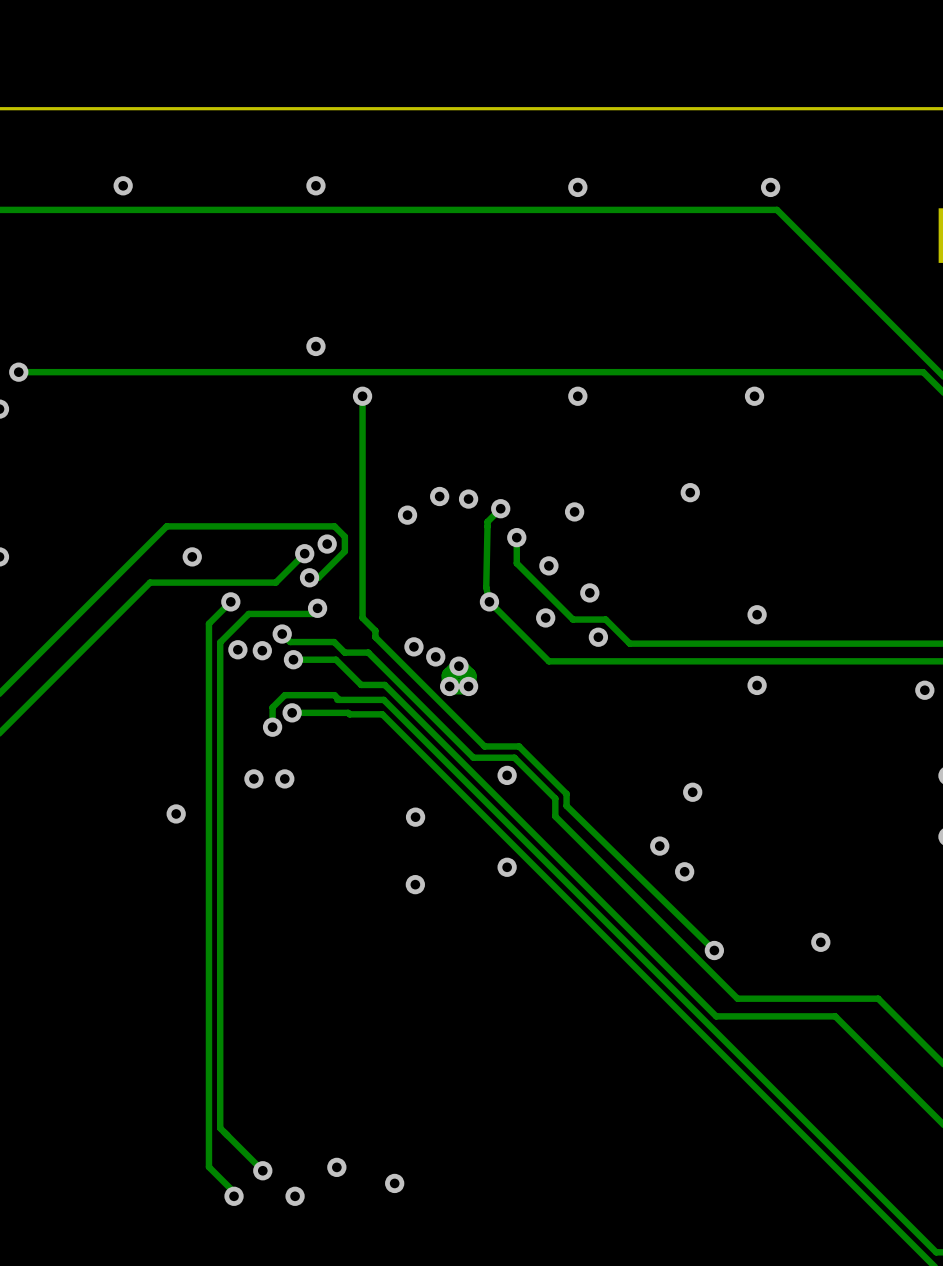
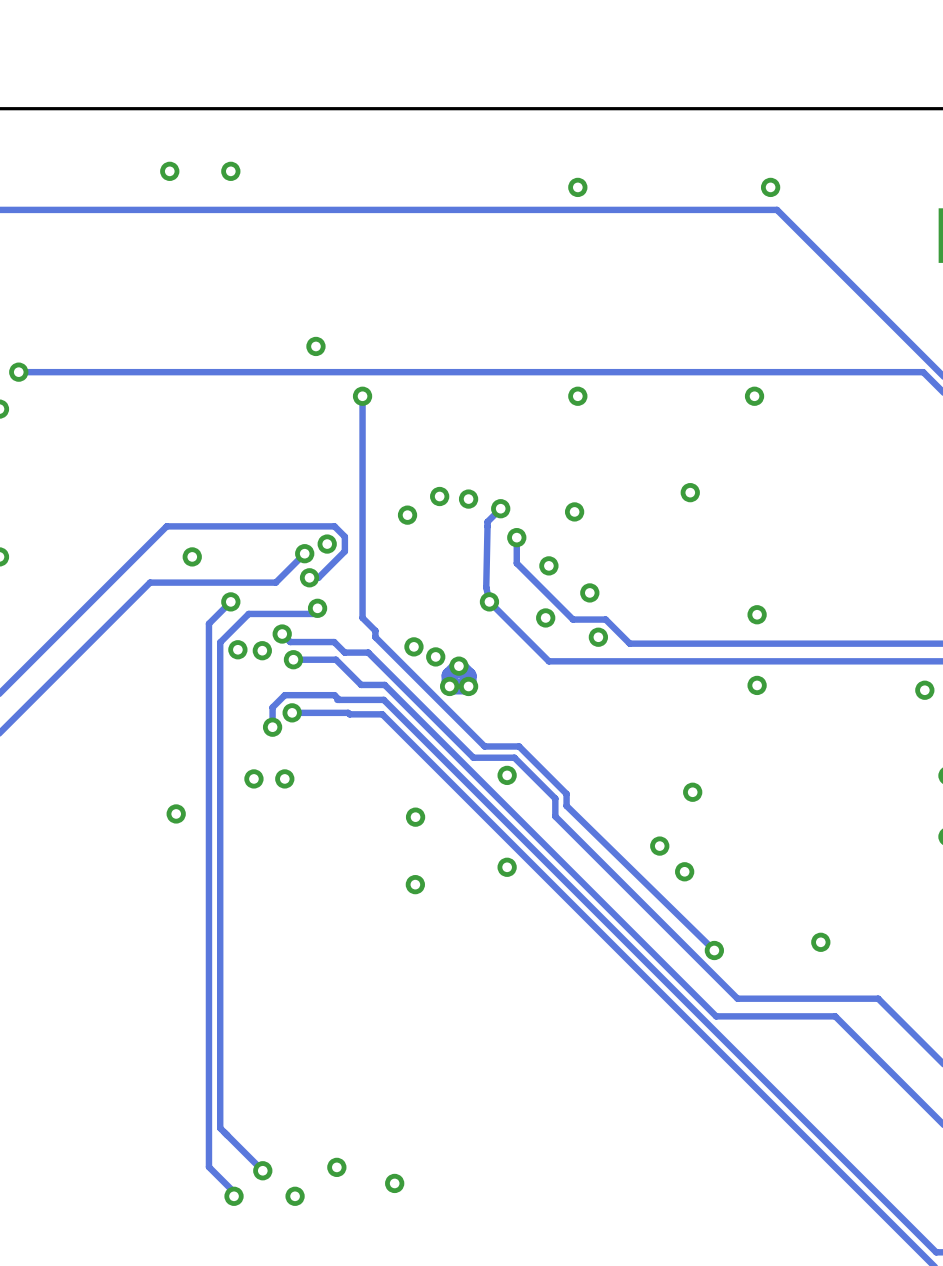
via: none -> (230, 171)
via position: (123, 185) -> (169, 171)
via: (315, 185) -> none

